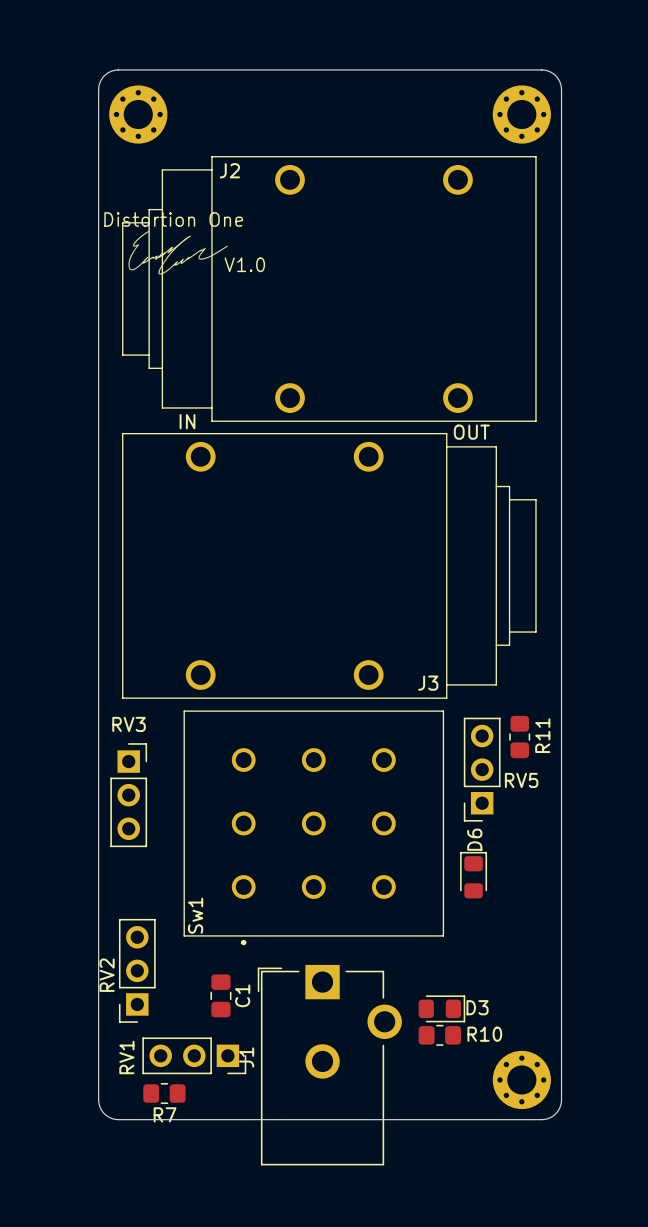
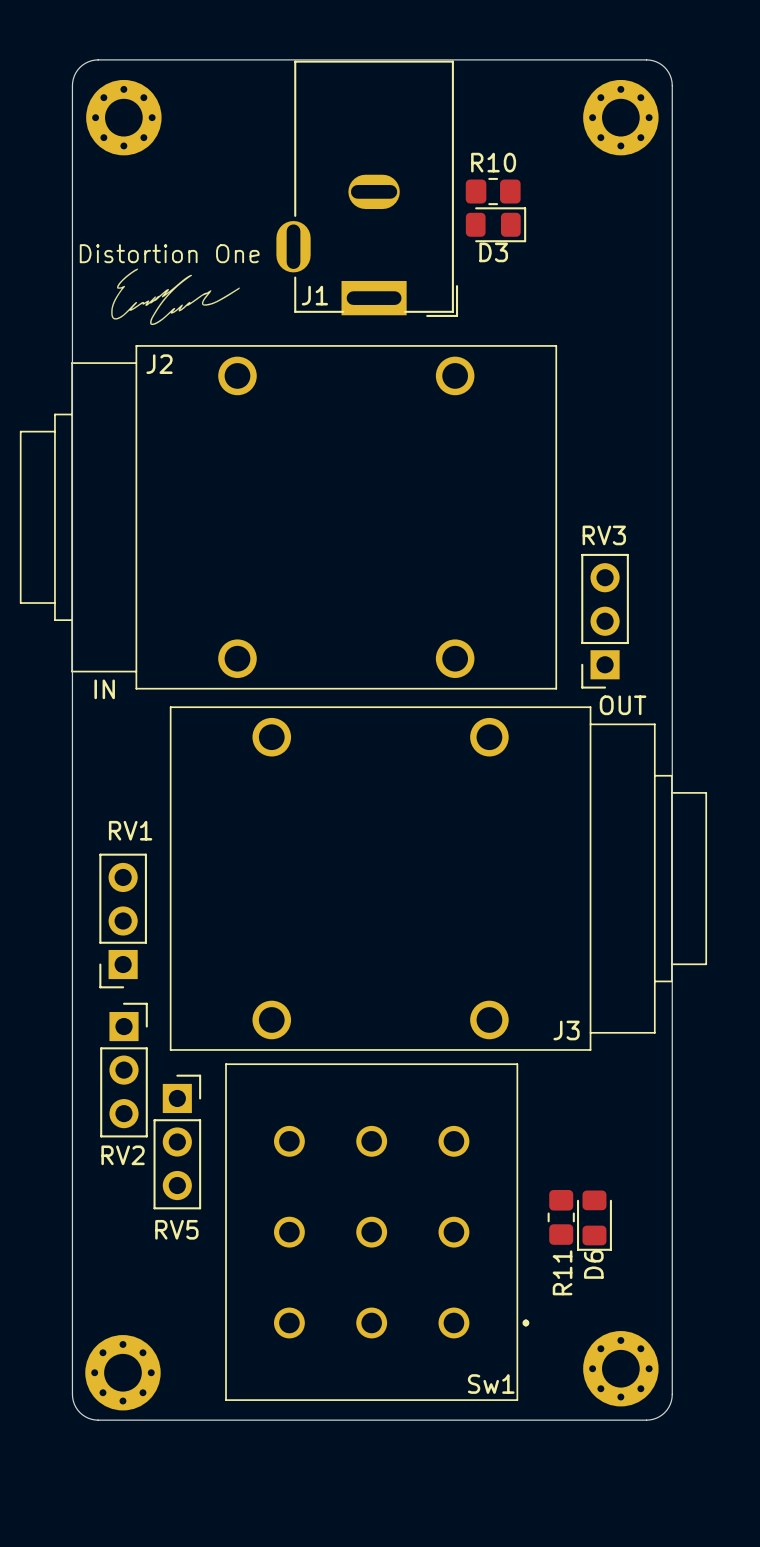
text: V1.0 (244, 264) -> none
J2 position: (329, 288) -> (288, 517)
J3 position: (329, 565) -> (438, 878)
R11 name position: R11 (542, 735) -> R11 (562, 1272)
R11 position: (519, 737) -> (561, 1217)
RV5 rotation: 0° (482, 769) -> 180° (177, 1142)
RV5 position: (482, 769) -> (177, 1142)
RV5 name position: RV5 (521, 780) -> RV5 (176, 1229)
RV3 rotation: 0° (128, 795) -> 180° (605, 621)
RV3 position: (128, 795) -> (605, 621)
Sw1 rotation: 0° (313, 827) -> 90° counterclockwise (377, 1232)
D6 rotation: 0° (473, 875) -> 180° (594, 1220)
D6 position: (473, 875) -> (594, 1220)
J1 footprint: [257, 964, 402, 1166] -> [276, 60, 459, 317]
RV2 position: (137, 970) -> (123, 920)
RV2 name rotation: 0° (107, 975) -> 90° clockwise (123, 1155)
RV2 name position: RV2 (107, 975) -> RV2 (123, 1155)
C1: (220, 995) -> none
D3 name position: D3 (477, 1007) -> D3 (493, 252)
D3 position: (441, 1008) -> (496, 224)
R10 name position: R10 (484, 1034) -> R10 (493, 162)
R10 position: (439, 1035) -> (493, 191)
RV1 rotation: 0° (194, 1055) -> 90° counterclockwise (124, 1070)
RV1 position: (194, 1055) -> (124, 1070)
RV1 name position: RV1 (126, 1057) -> RV1 (130, 830)
J1 name position: J1 (246, 1057) -> J1 (314, 295)
part: none -> (122, 1372)
R7: (164, 1093) -> none

